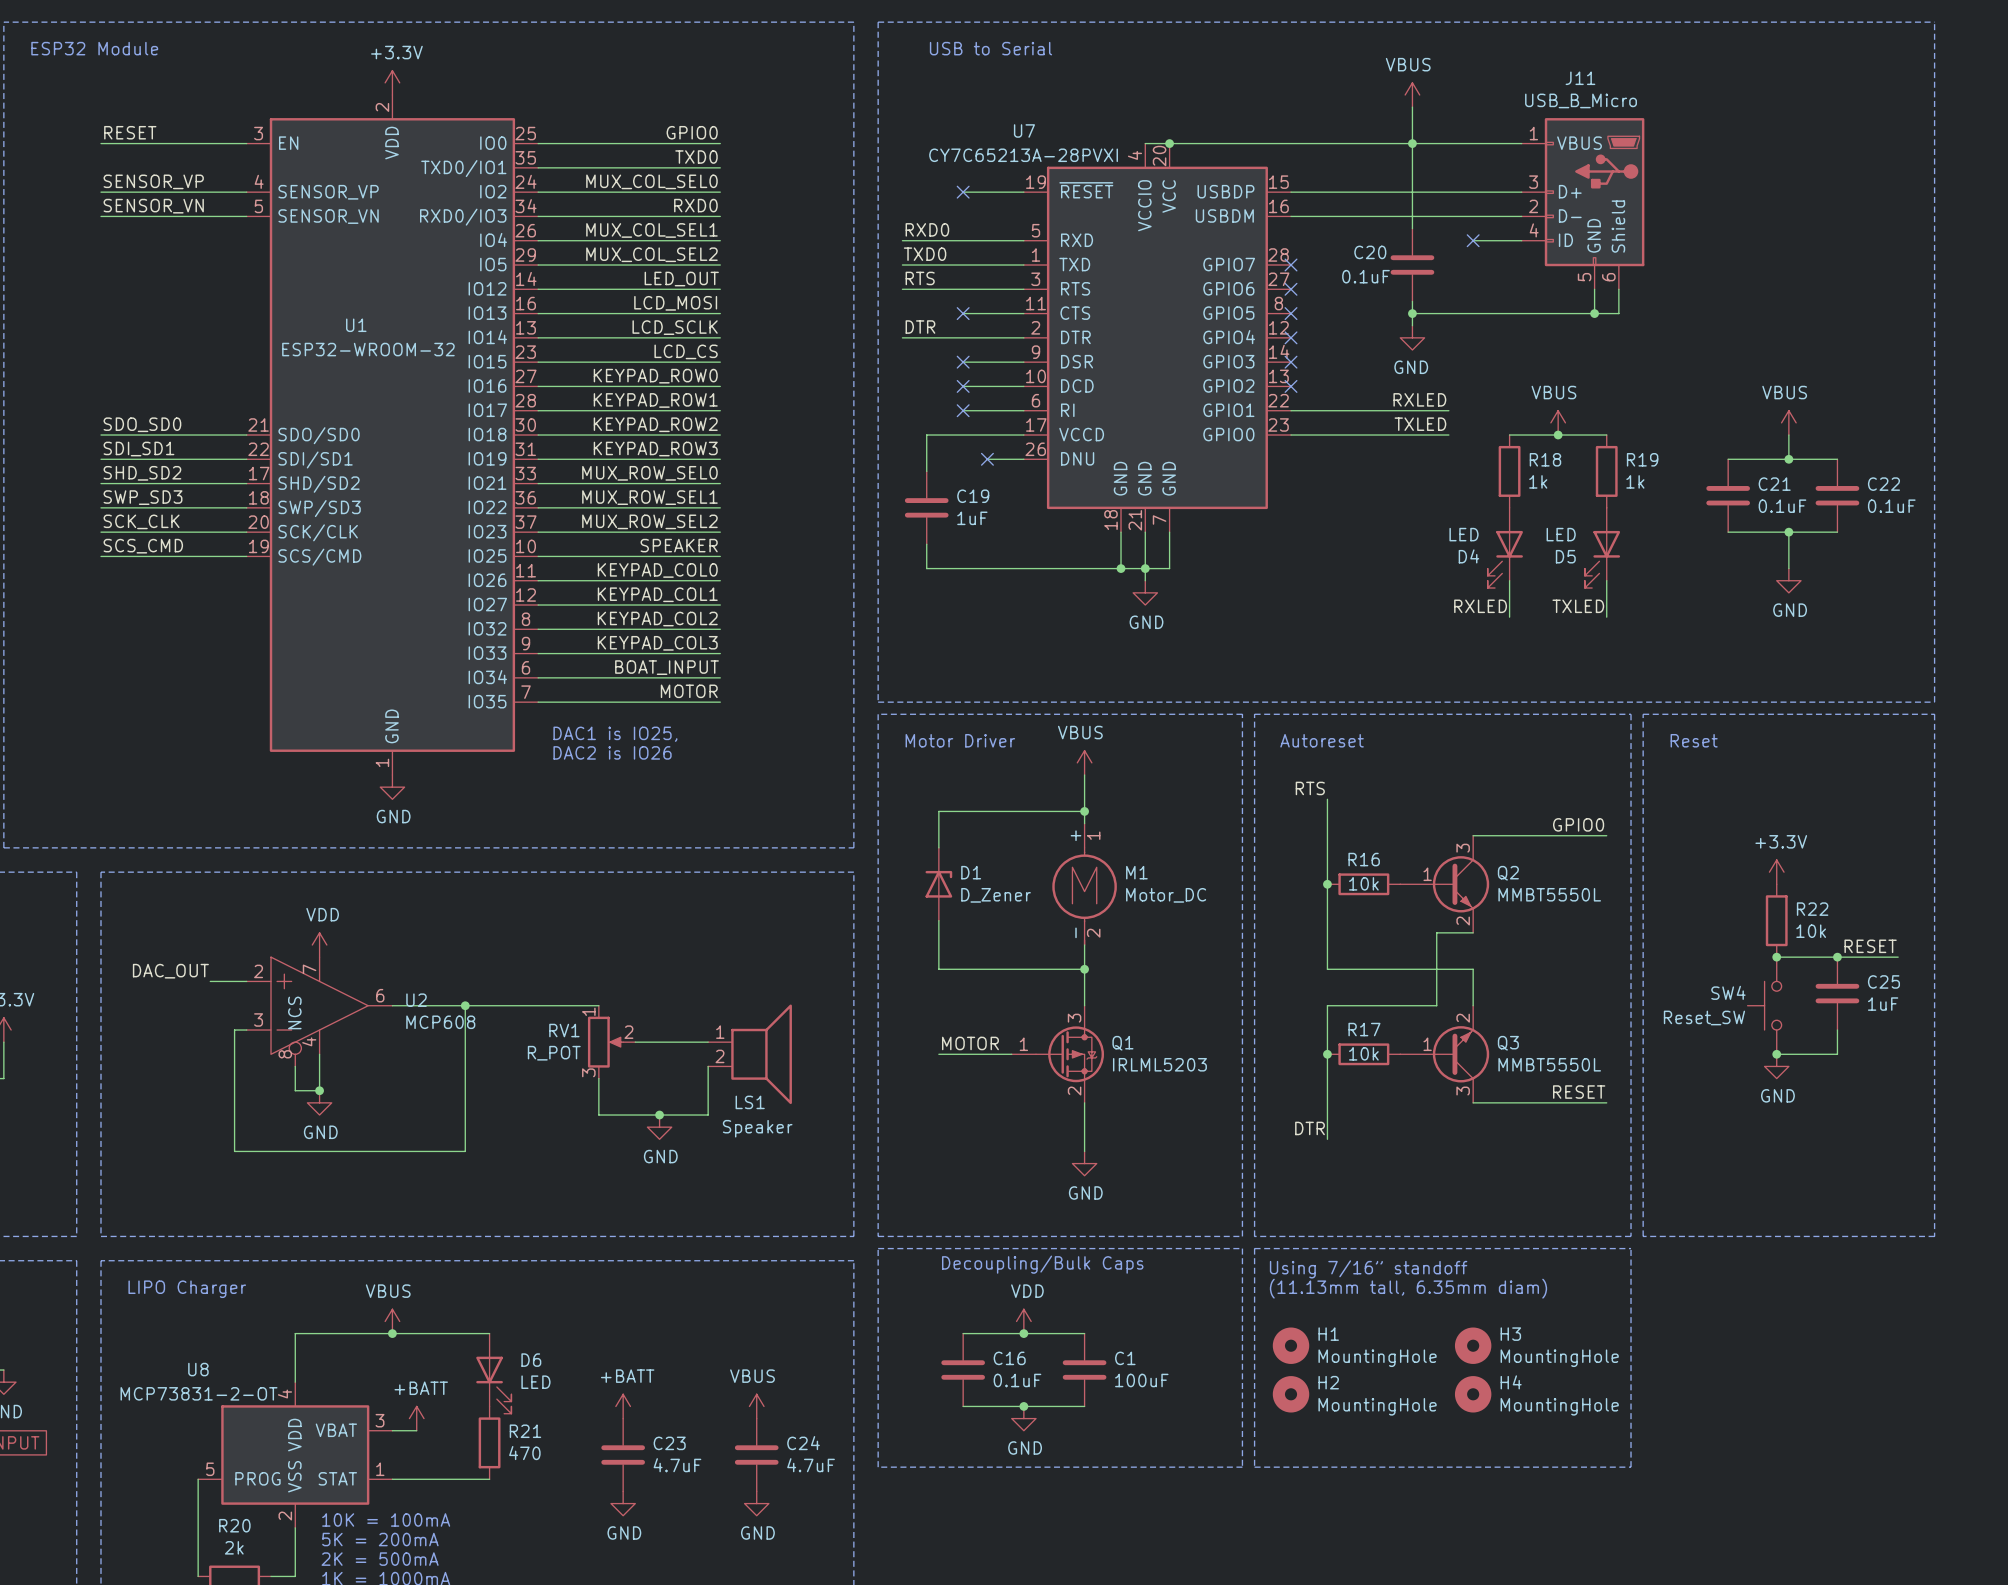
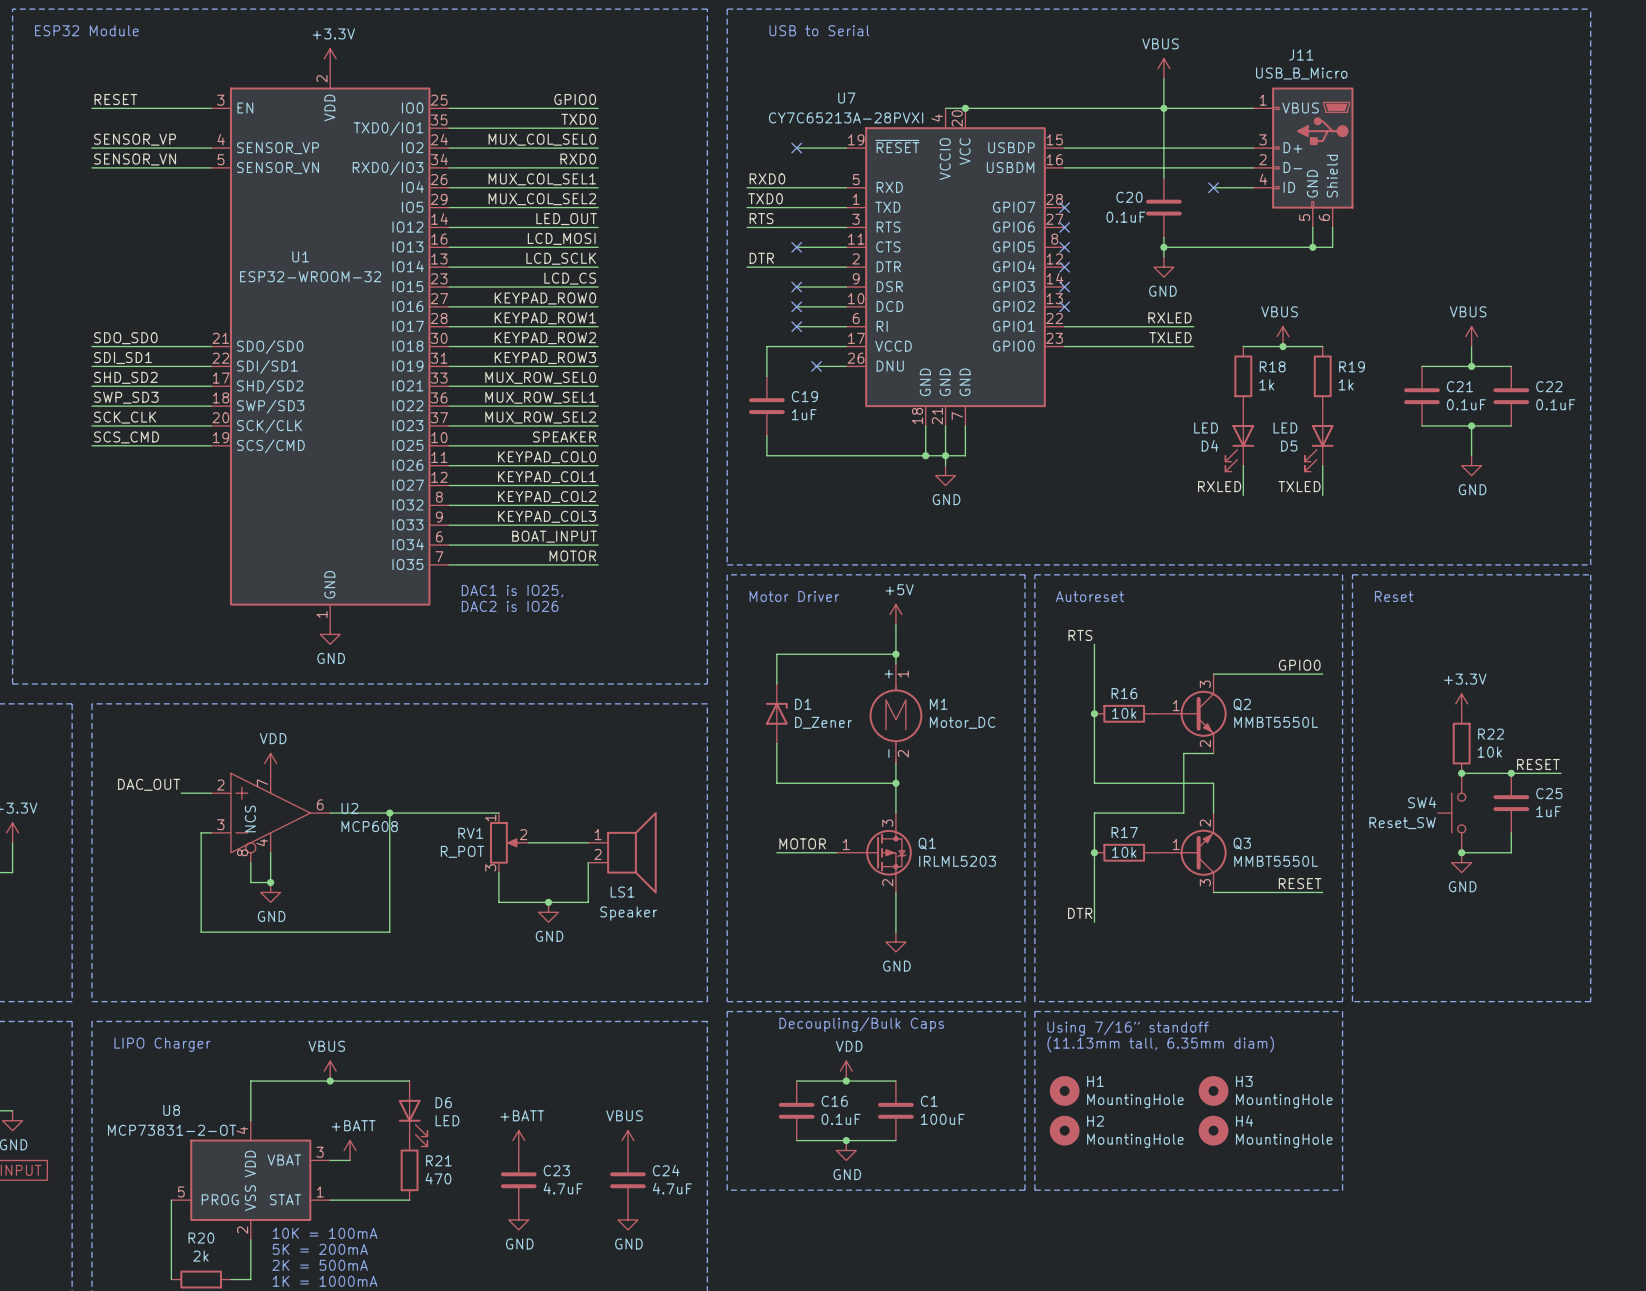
power symbol: VBUS (1084, 762) -> +5V (895, 614)

